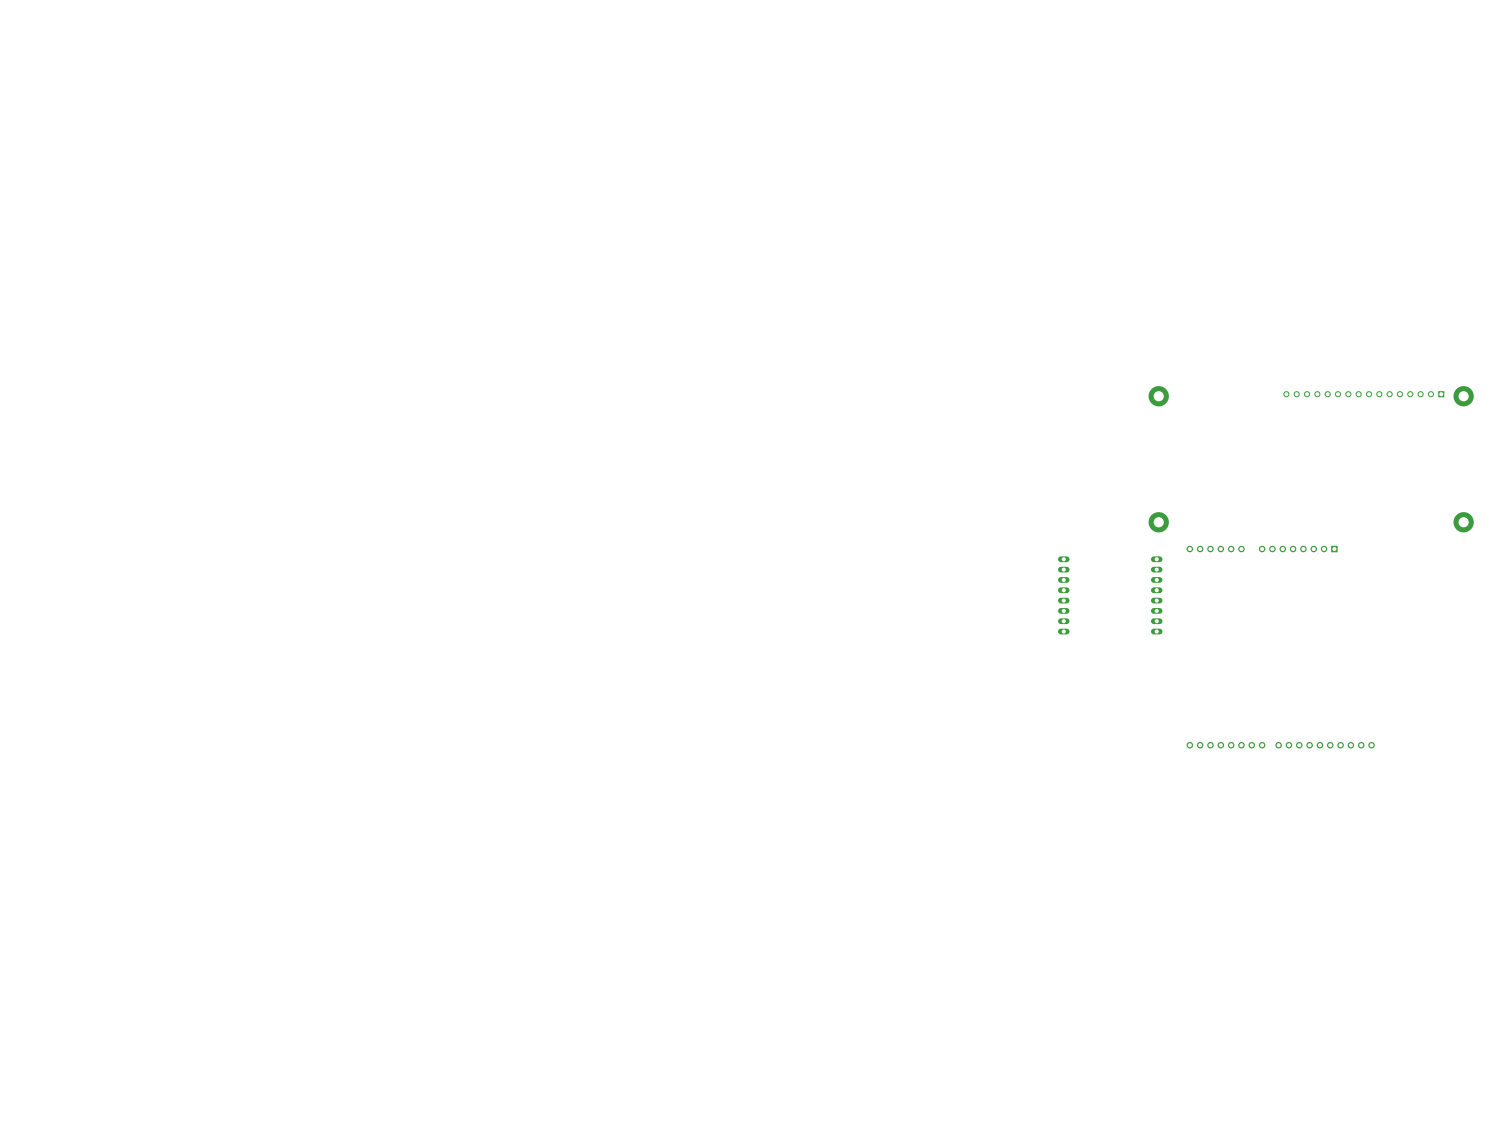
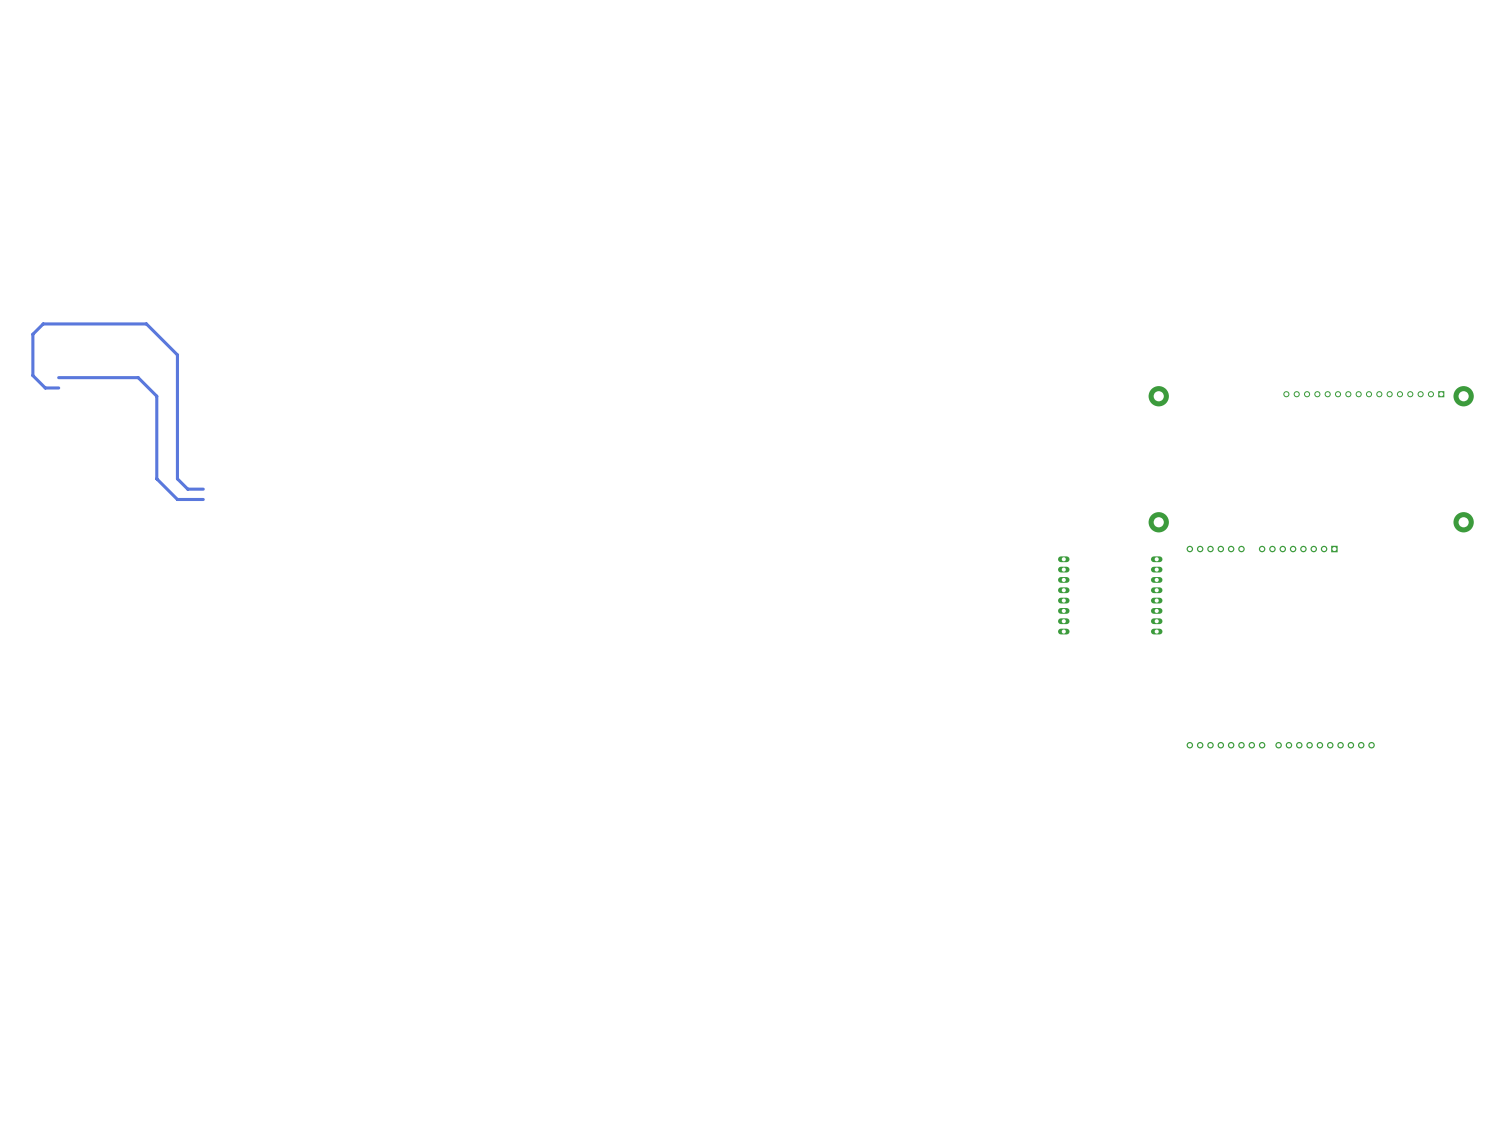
bottom track: none -> (58, 377) (138, 377) (156, 396) (156, 478) (177, 499) (203, 499)
bottom track: none -> (58, 387) (45, 387) (32, 375) (32, 334) (43, 323) (146, 323) (177, 354) (177, 478) (187, 489) (203, 489)

